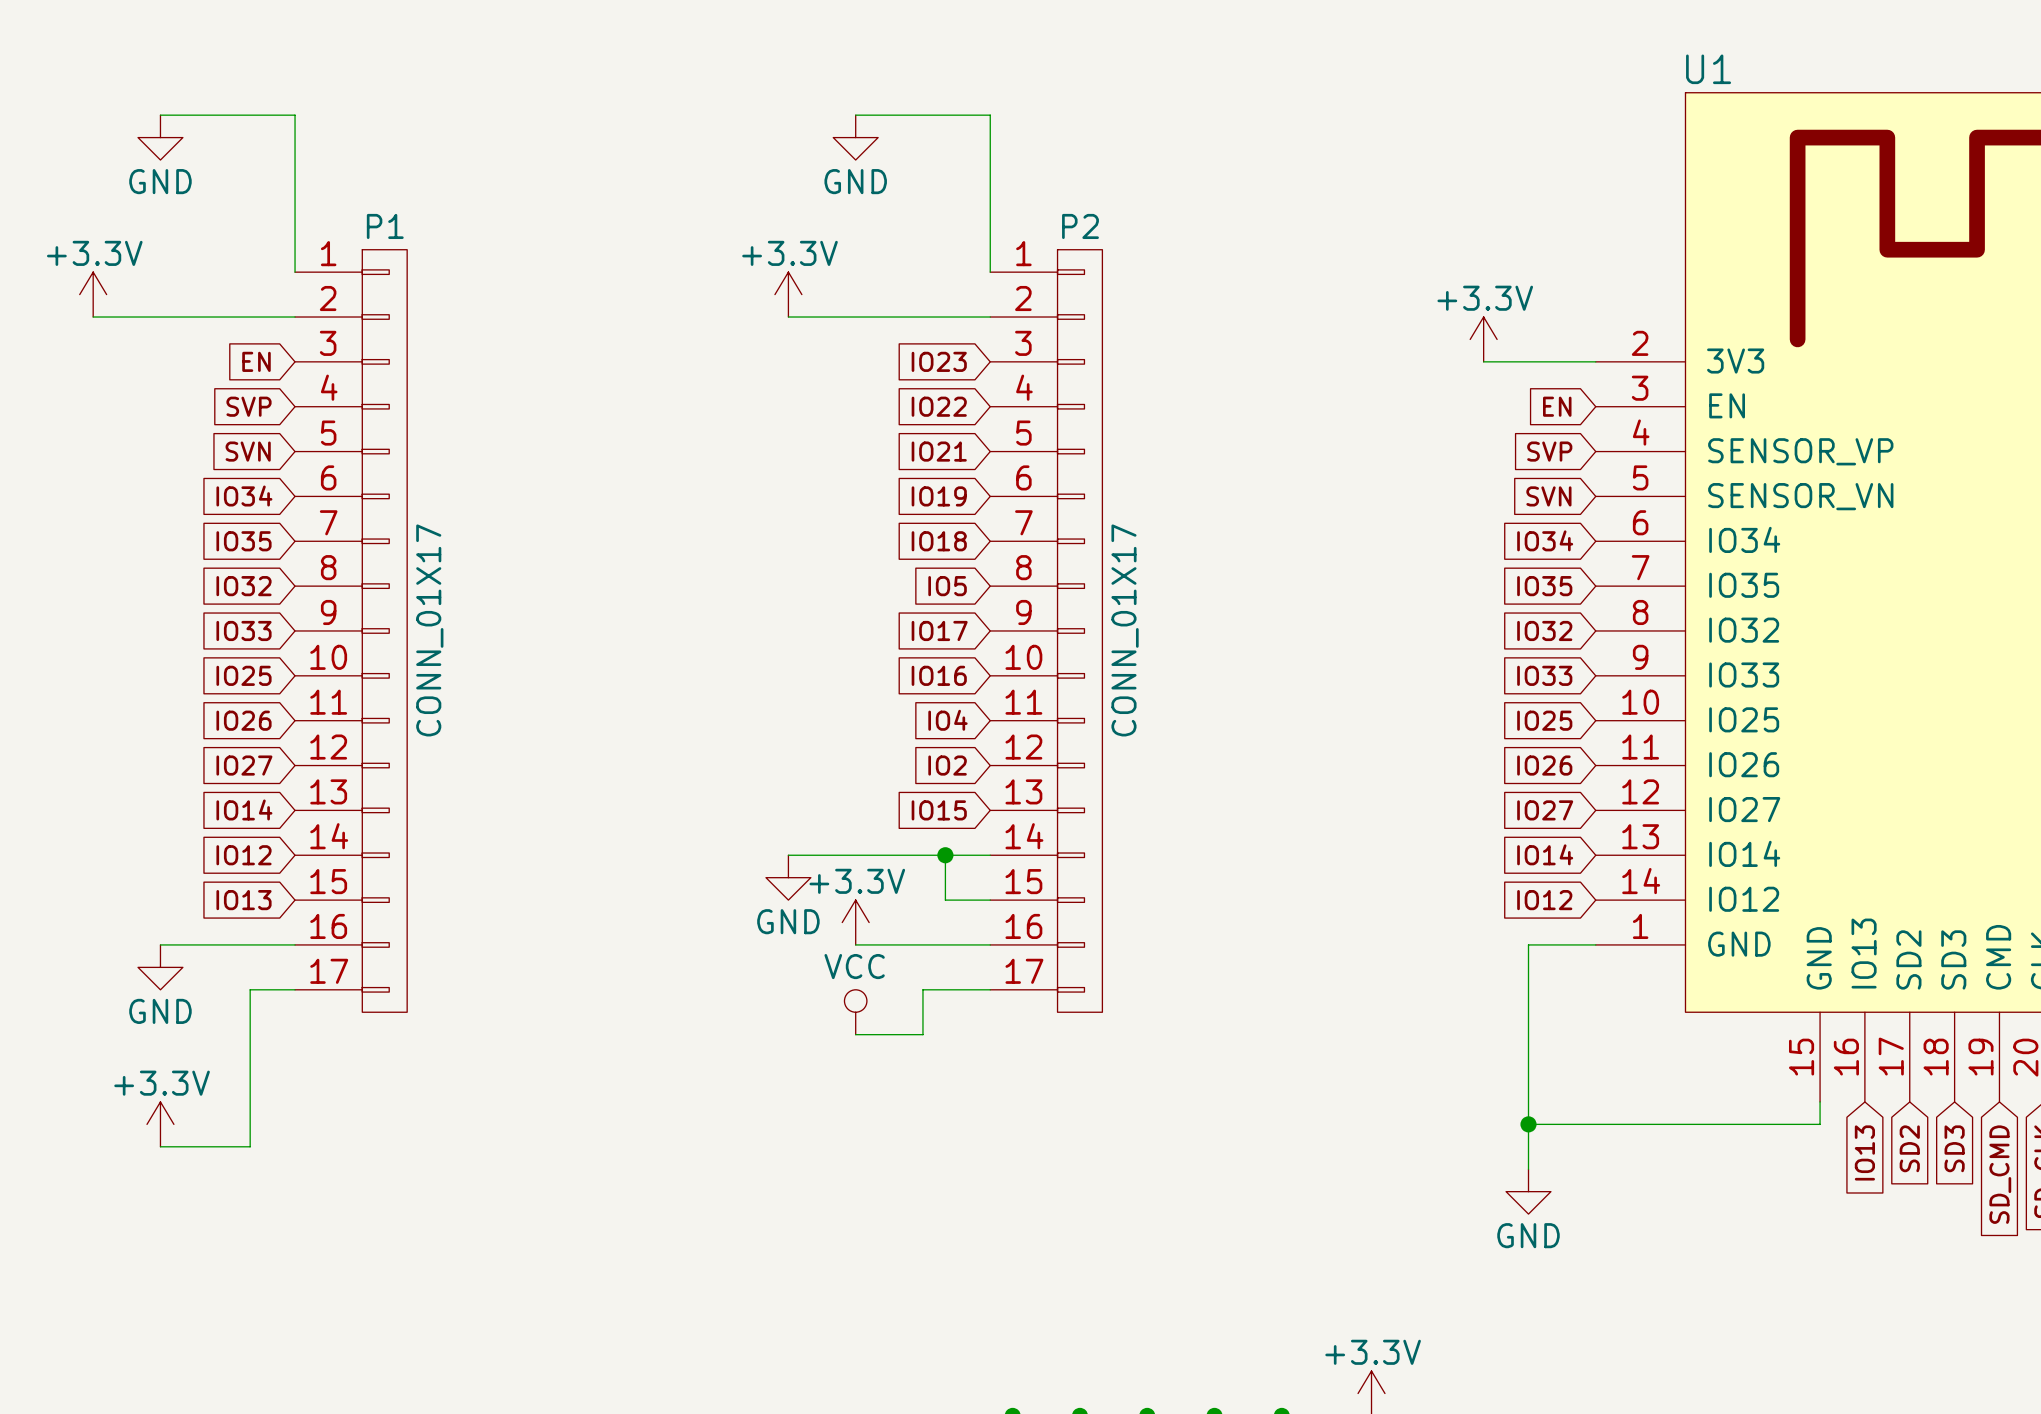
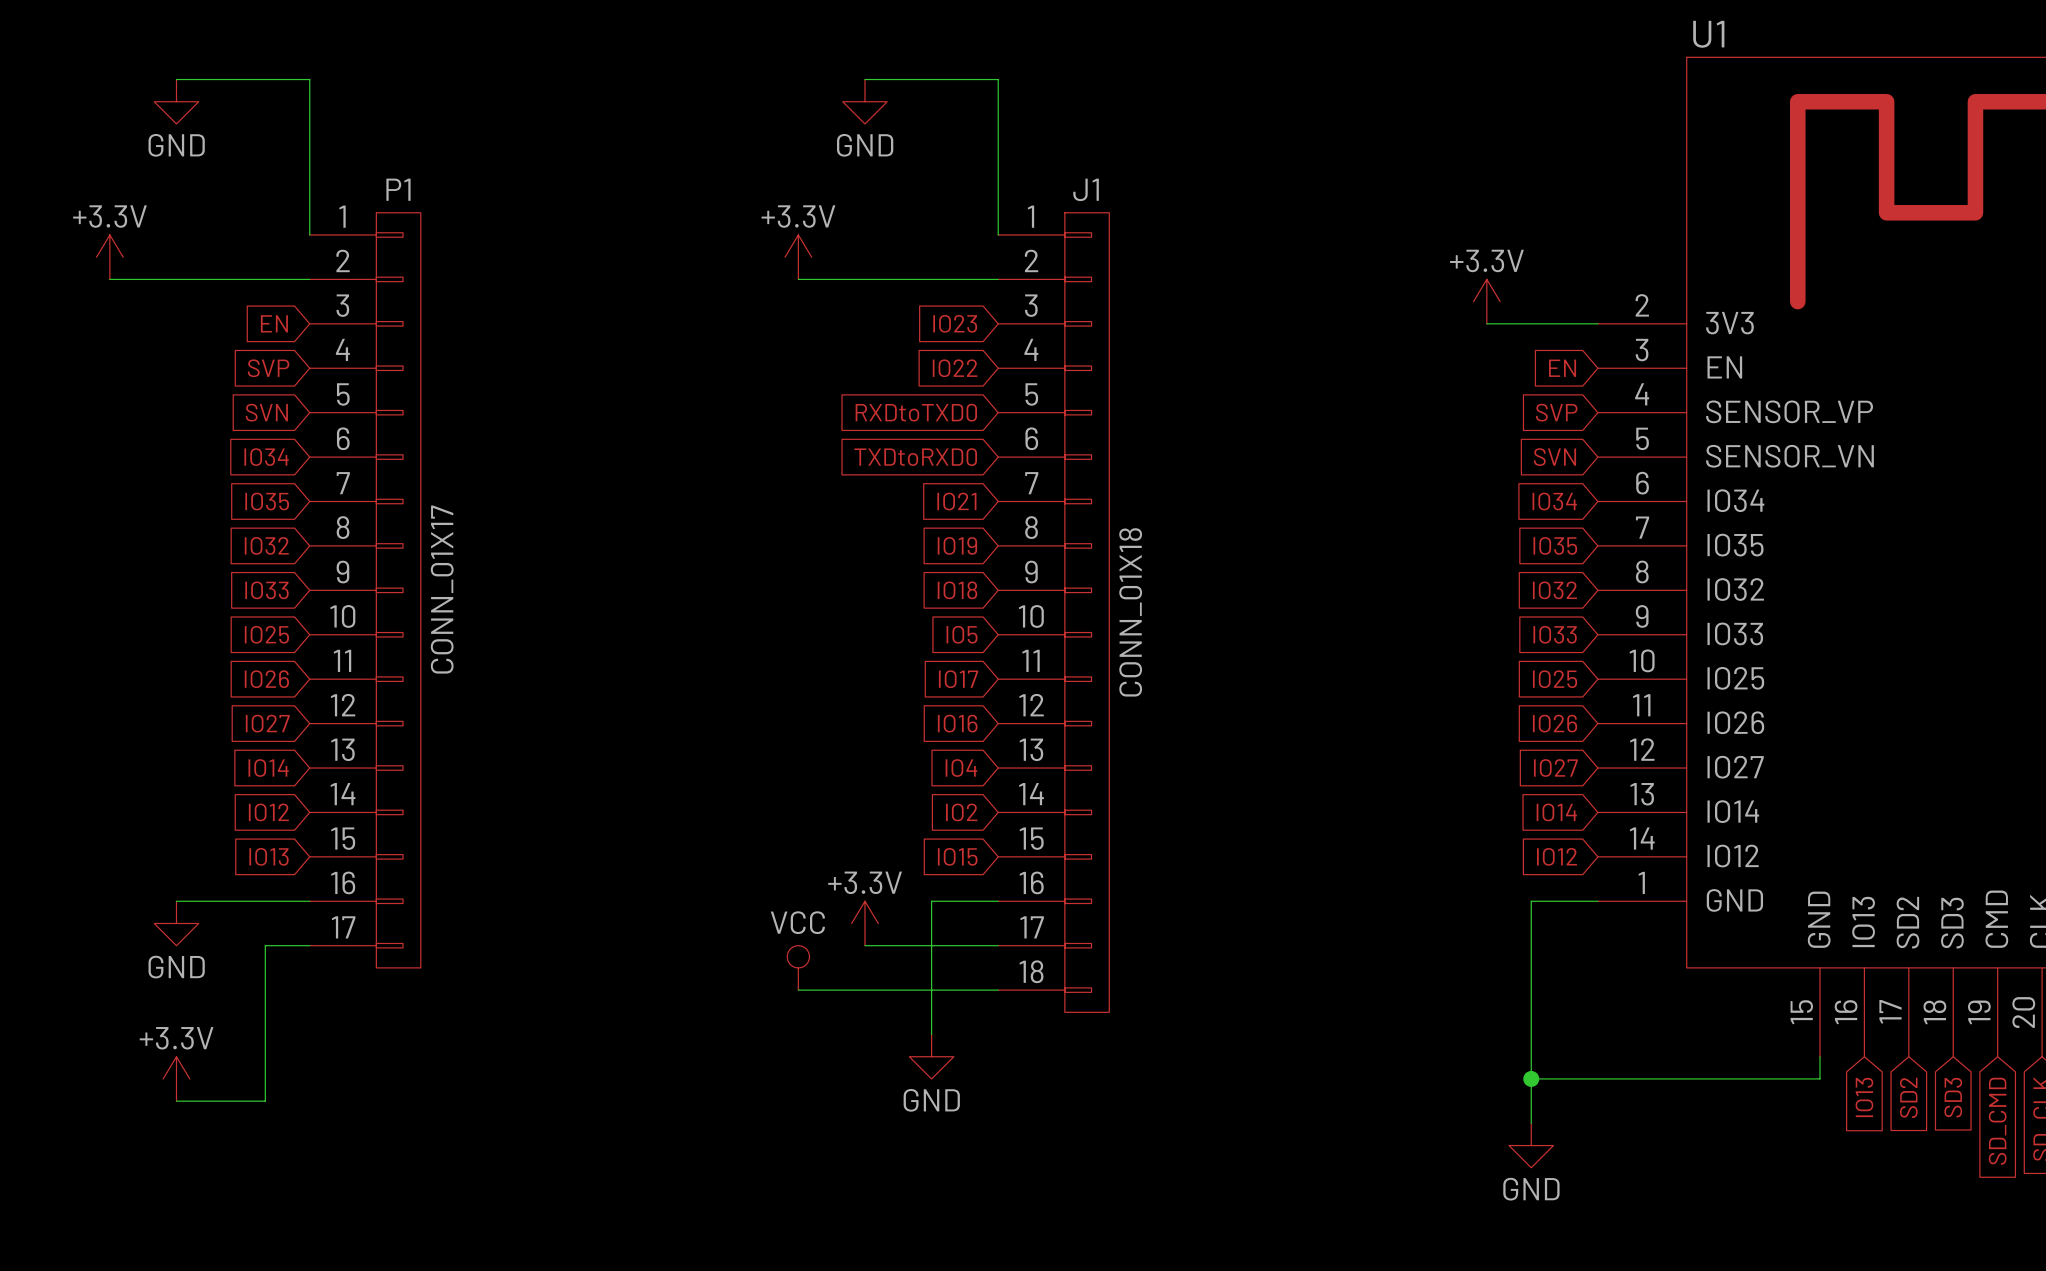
global label: IO21 (939, 451) -> RXDtoTXD0 (916, 412)
global label: IO19 (939, 496) -> TXDtoRXD0 (915, 457)
global label: IO18 (939, 541) -> IO21 (956, 501)
global label: IO5 (947, 586) -> IO19 (957, 545)
global label: IO17 (939, 630) -> IO18 (957, 590)
P2: CONN_01X17 (1046, 630) -> none
J1: none -> CONN_01X18 (1053, 612)
global label: IO16 (939, 675) -> IO5 (962, 634)
global label: IO4 (947, 720) -> IO17 (958, 679)
global label: IO2 (947, 765) -> IO16 (957, 723)
global label: IO15 (939, 810) -> IO4 (961, 768)
wire: (788, 855) (990, 855) -> none
wire: (945, 855) (945, 900) (990, 900) -> none
junction: (945, 855) -> none
global label: none -> IO2 (961, 812)
power symbol position: GND (788, 877) -> GND (931, 1056)
global label: none -> IO15 (957, 856)
power symbol position: +3.3V (855, 922) -> +3.3V (864, 923)
wire: (855, 944) (922, 944) -> (864, 945) (931, 945) (931, 901)
power symbol position: VCC (855, 1012) -> VCC (798, 967)
wire: none -> (798, 990) (864, 990)
wire: none -> (998, 990) (931, 990) (931, 1034)

